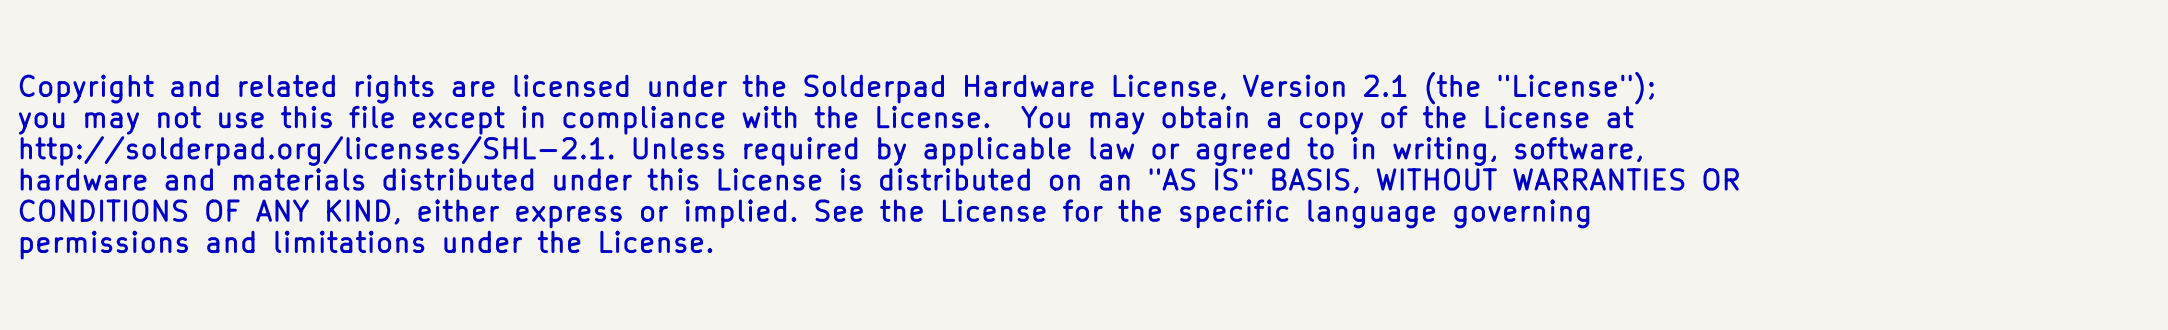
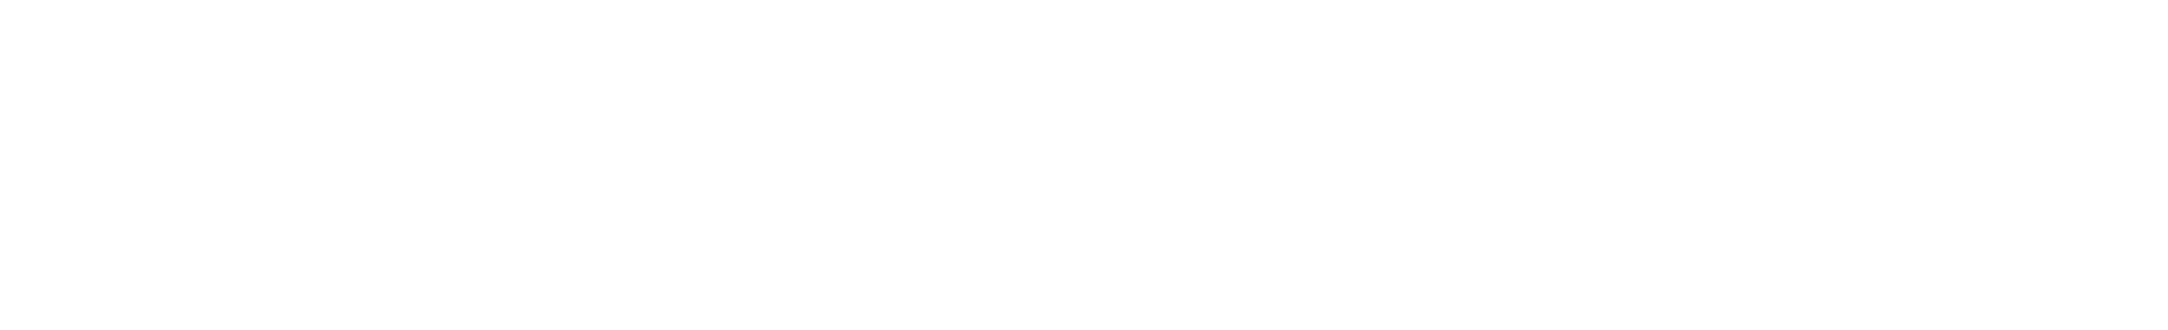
text: Copyright and related rights are licensed under the Solderpad Hardware License, Version 2.1 (the "License"); (836, 88) -> none
text: you may not use this file except in compliance with the License. You may obtain a copy of the License at (826, 120) -> none
text: http://solderpad.org/licenses/SHL-2.1. Unless required by applicable law or agreed to in writing, software, (831, 151) -> none
text: hardware and materials distributed under this License is distributed on an "AS IS" BASIS, WITHOUT WARRANTIES OR (879, 180) -> none
text: CONDITIONS OF ANY KIND, either express or implied. See the License for the specific language governing (804, 213) -> none
text: permissions and limitations under the License. (366, 245) -> none

